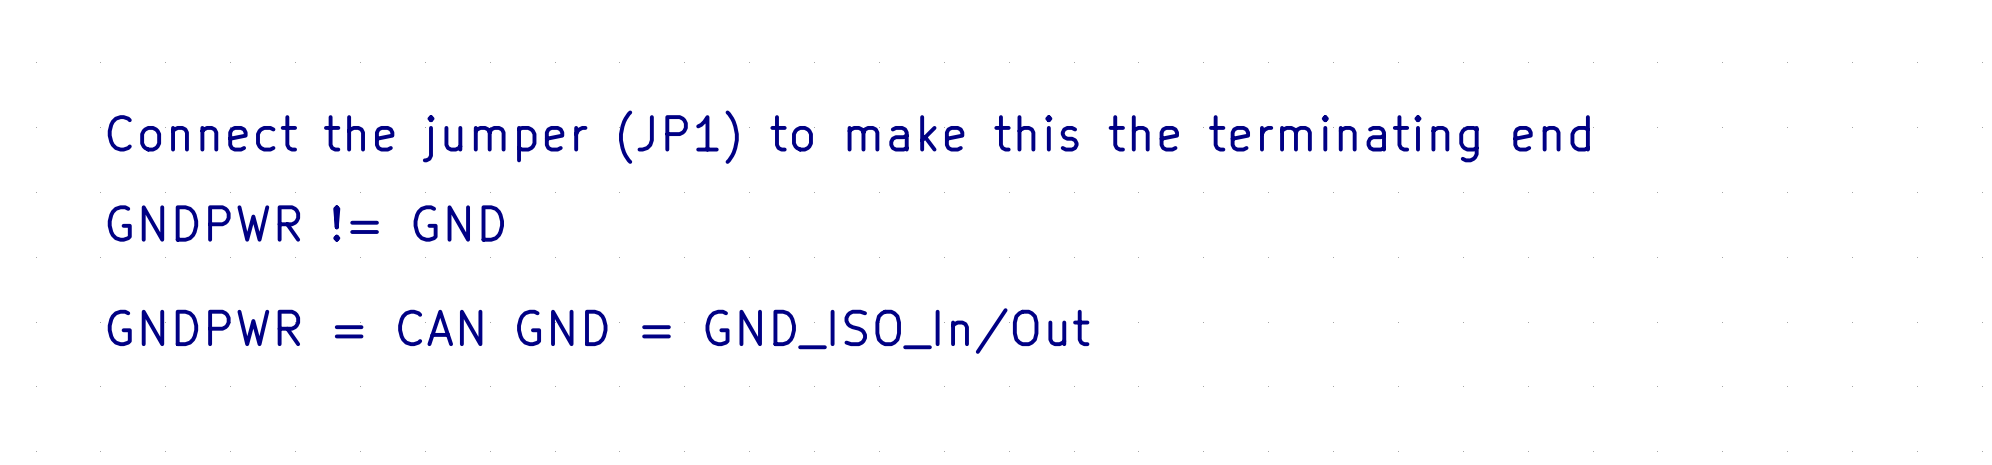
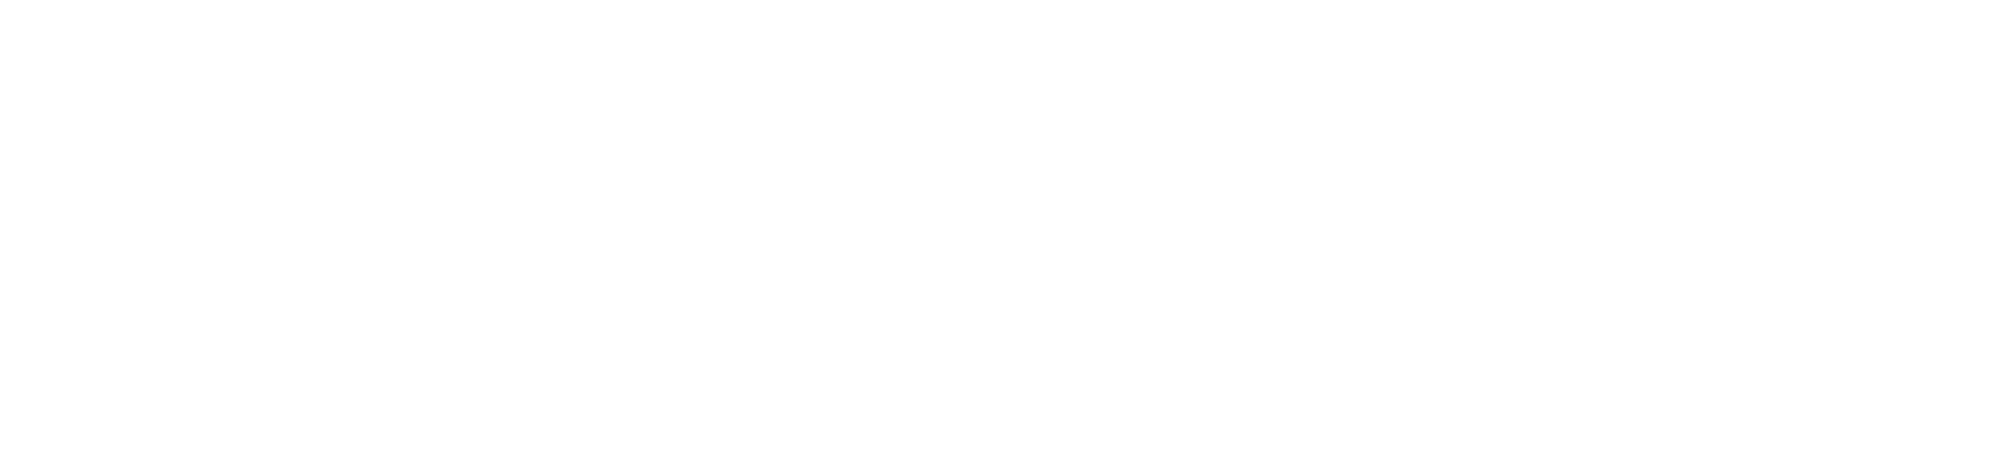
text: Connect the jumper (JP1) to make this the terminating end (848, 137) -> none
text: GNDPWR != GND (305, 223) -> none
text: GNDPWR = CAN GND = GND_ISO_In/Out (598, 331) -> none

